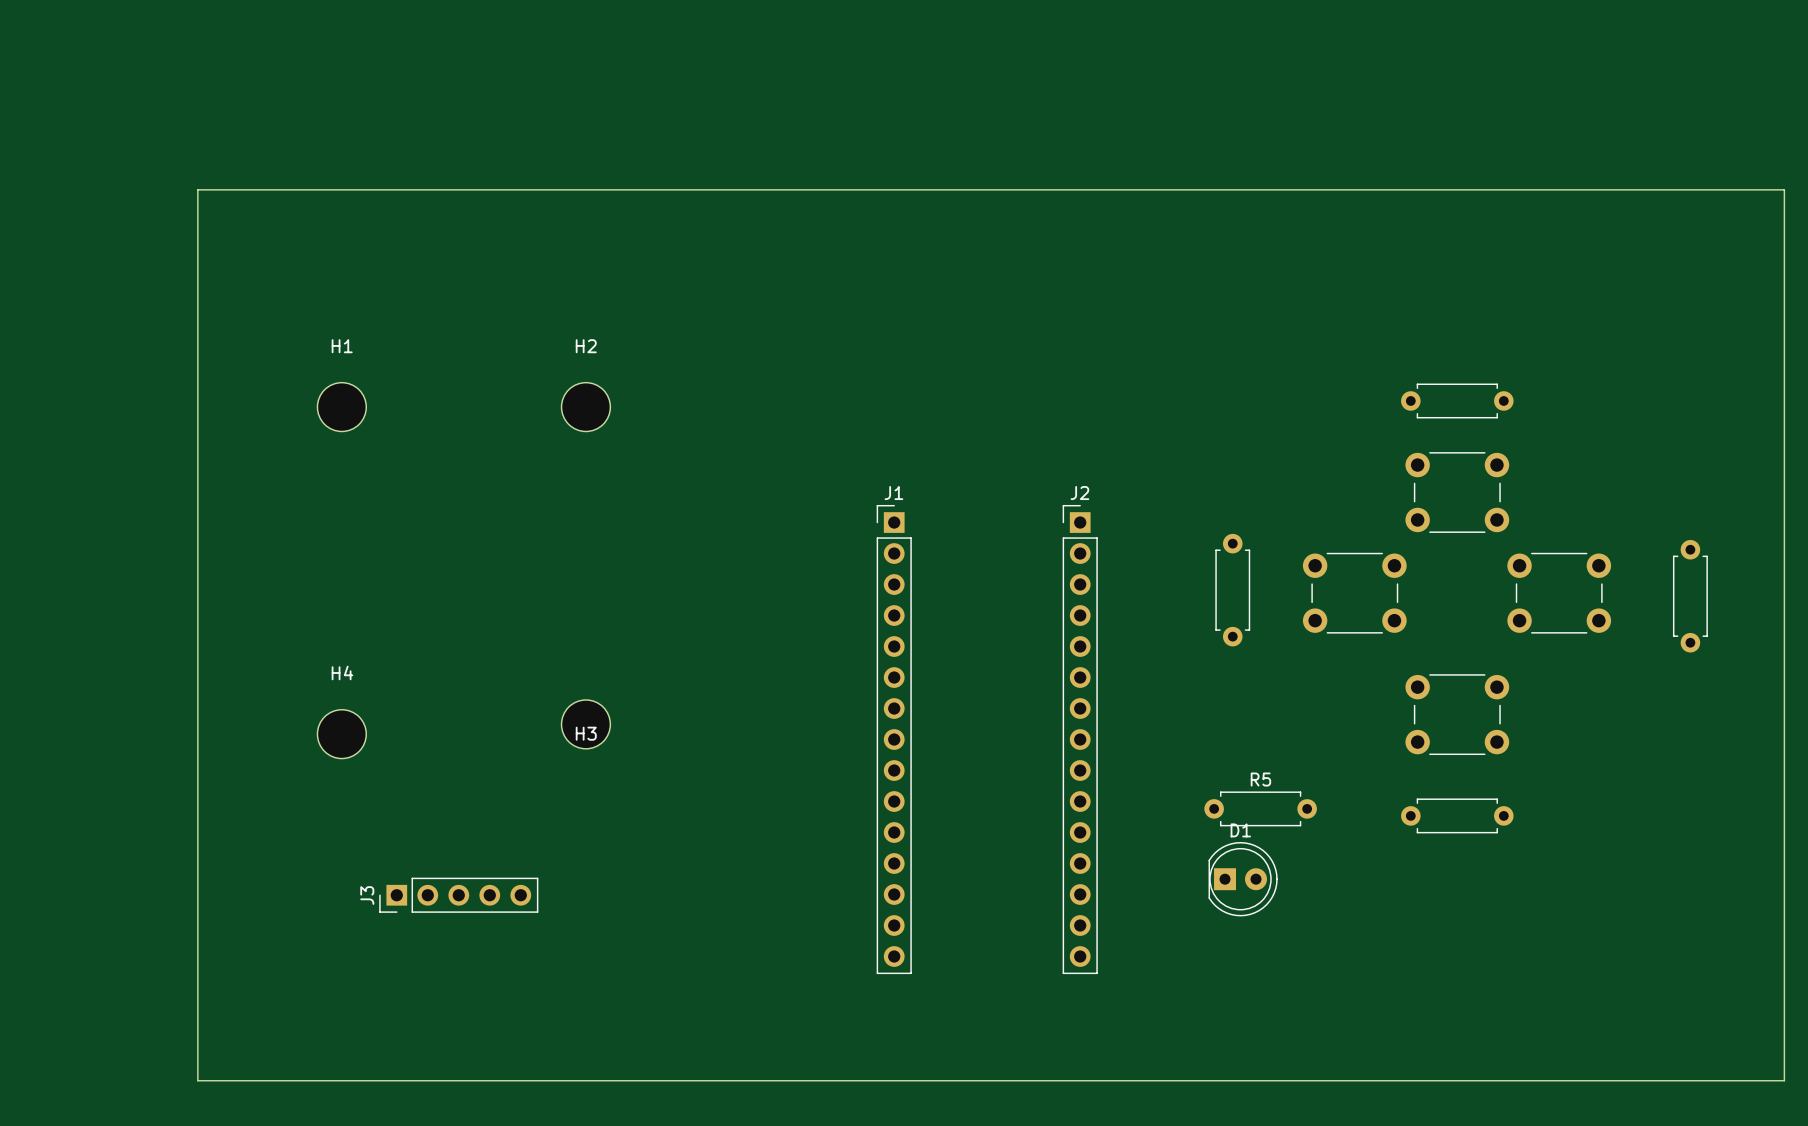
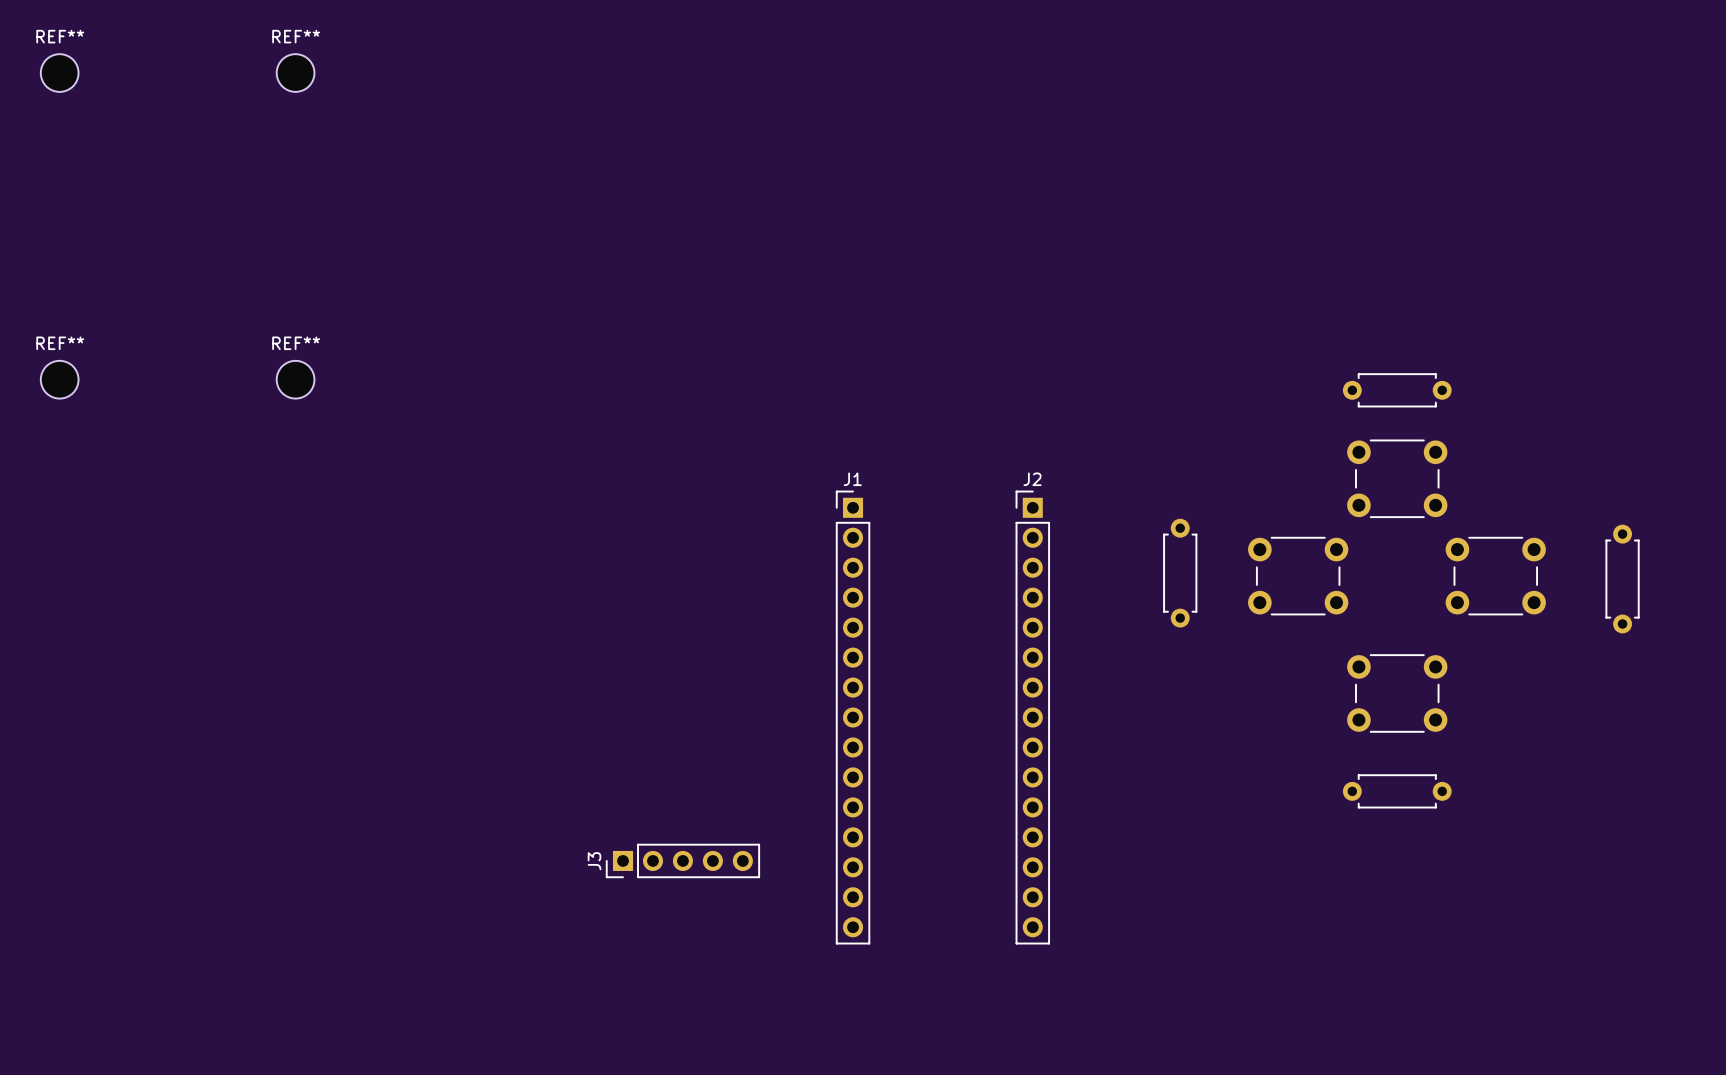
REF**: none -> (59, 73)
REF**: none -> (295, 73)
board edge: (197, 189) (1784, 189) (1784, 1080) (197, 1080) (197, 189) -> none
REF**: none -> (59, 379)
REF**: none -> (295, 379)
H1: (341, 407) -> none
H2: (585, 407) -> none
H3: (585, 724) -> none
H4: (341, 734) -> none
R5: (1260, 808) -> none
D1: (1243, 879) -> none
J3 position: (458, 895) -> (682, 860)

